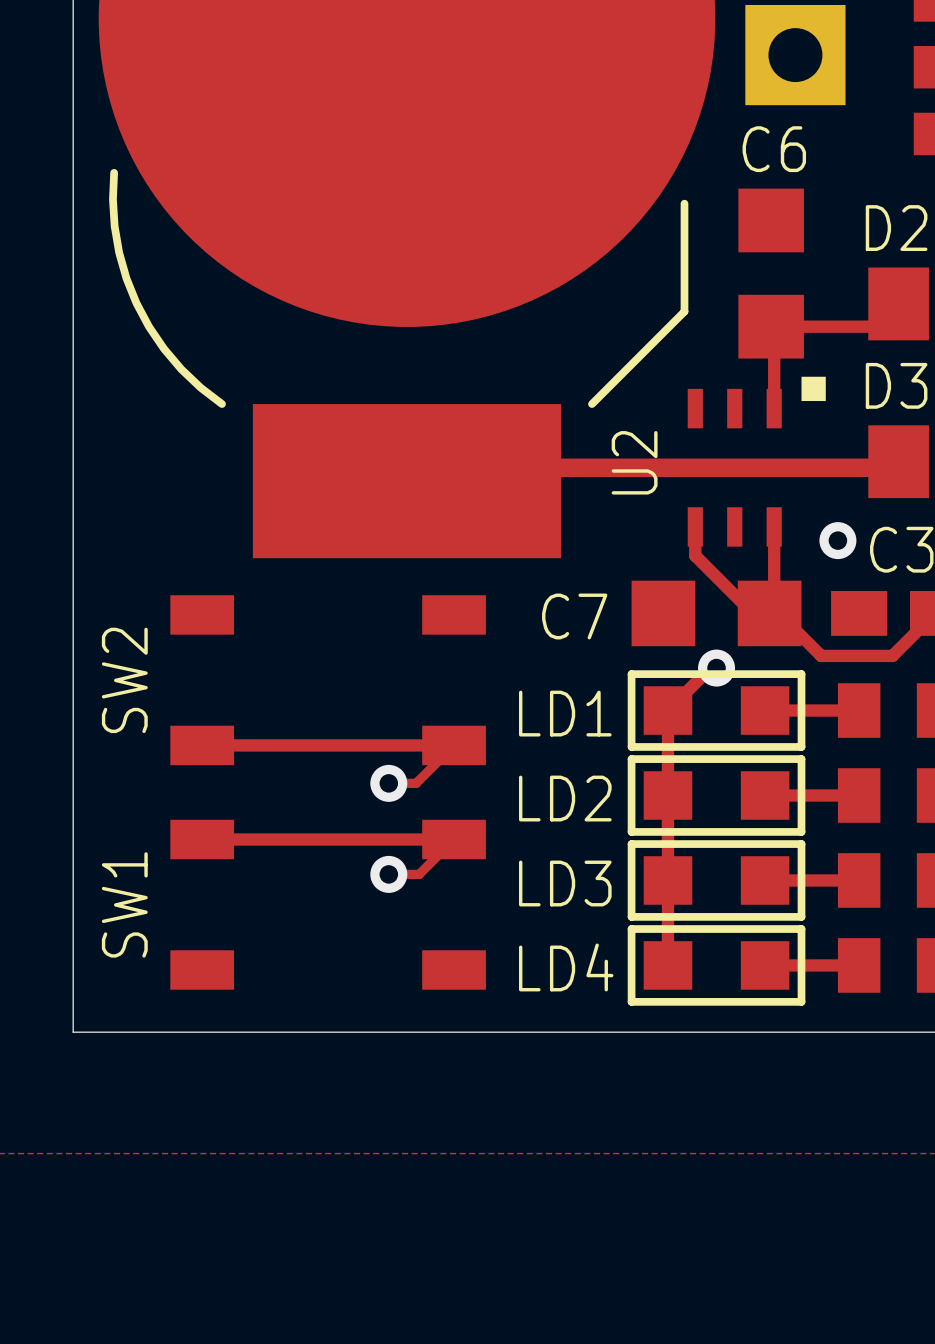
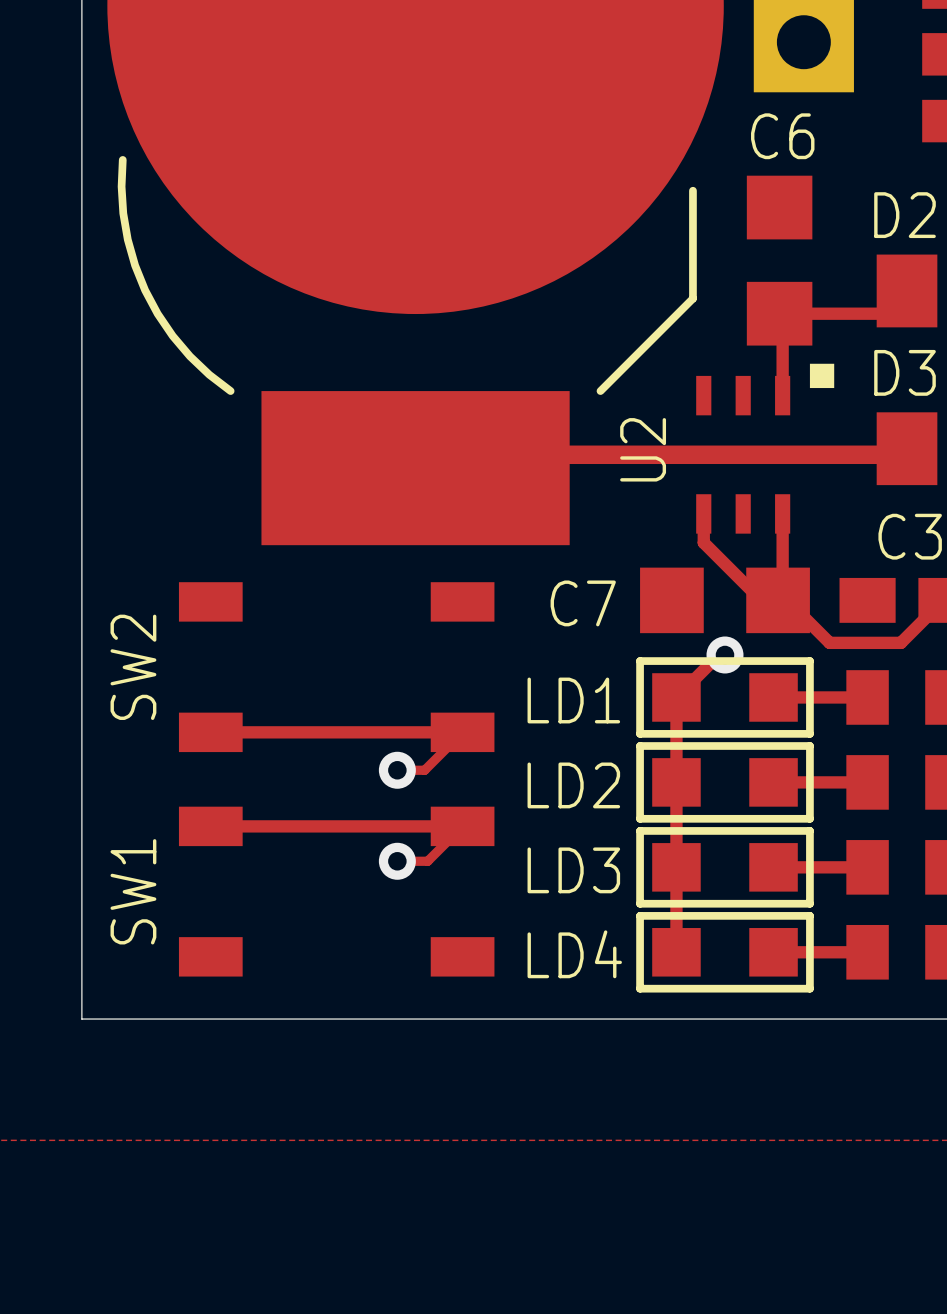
via: (837, 540) -> none

